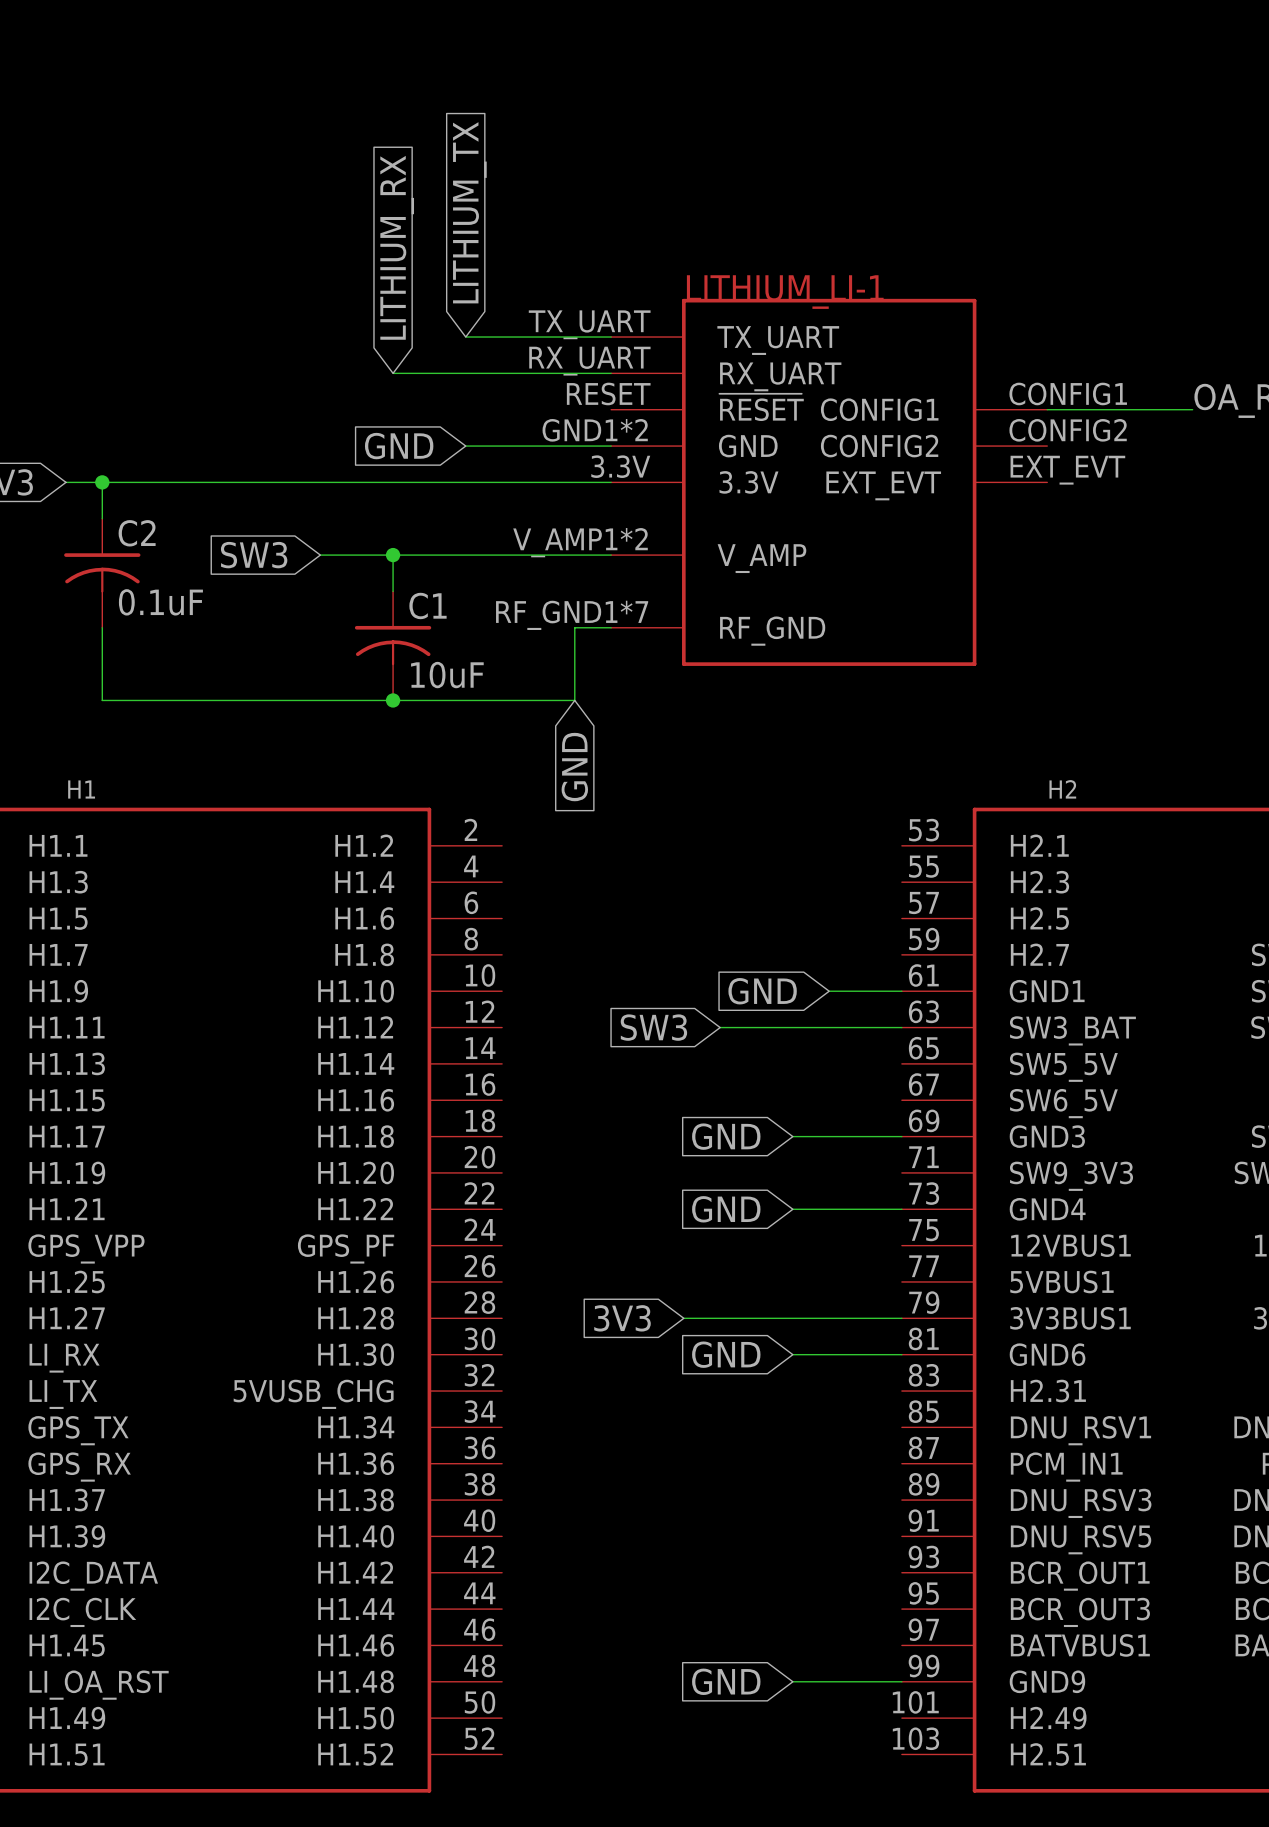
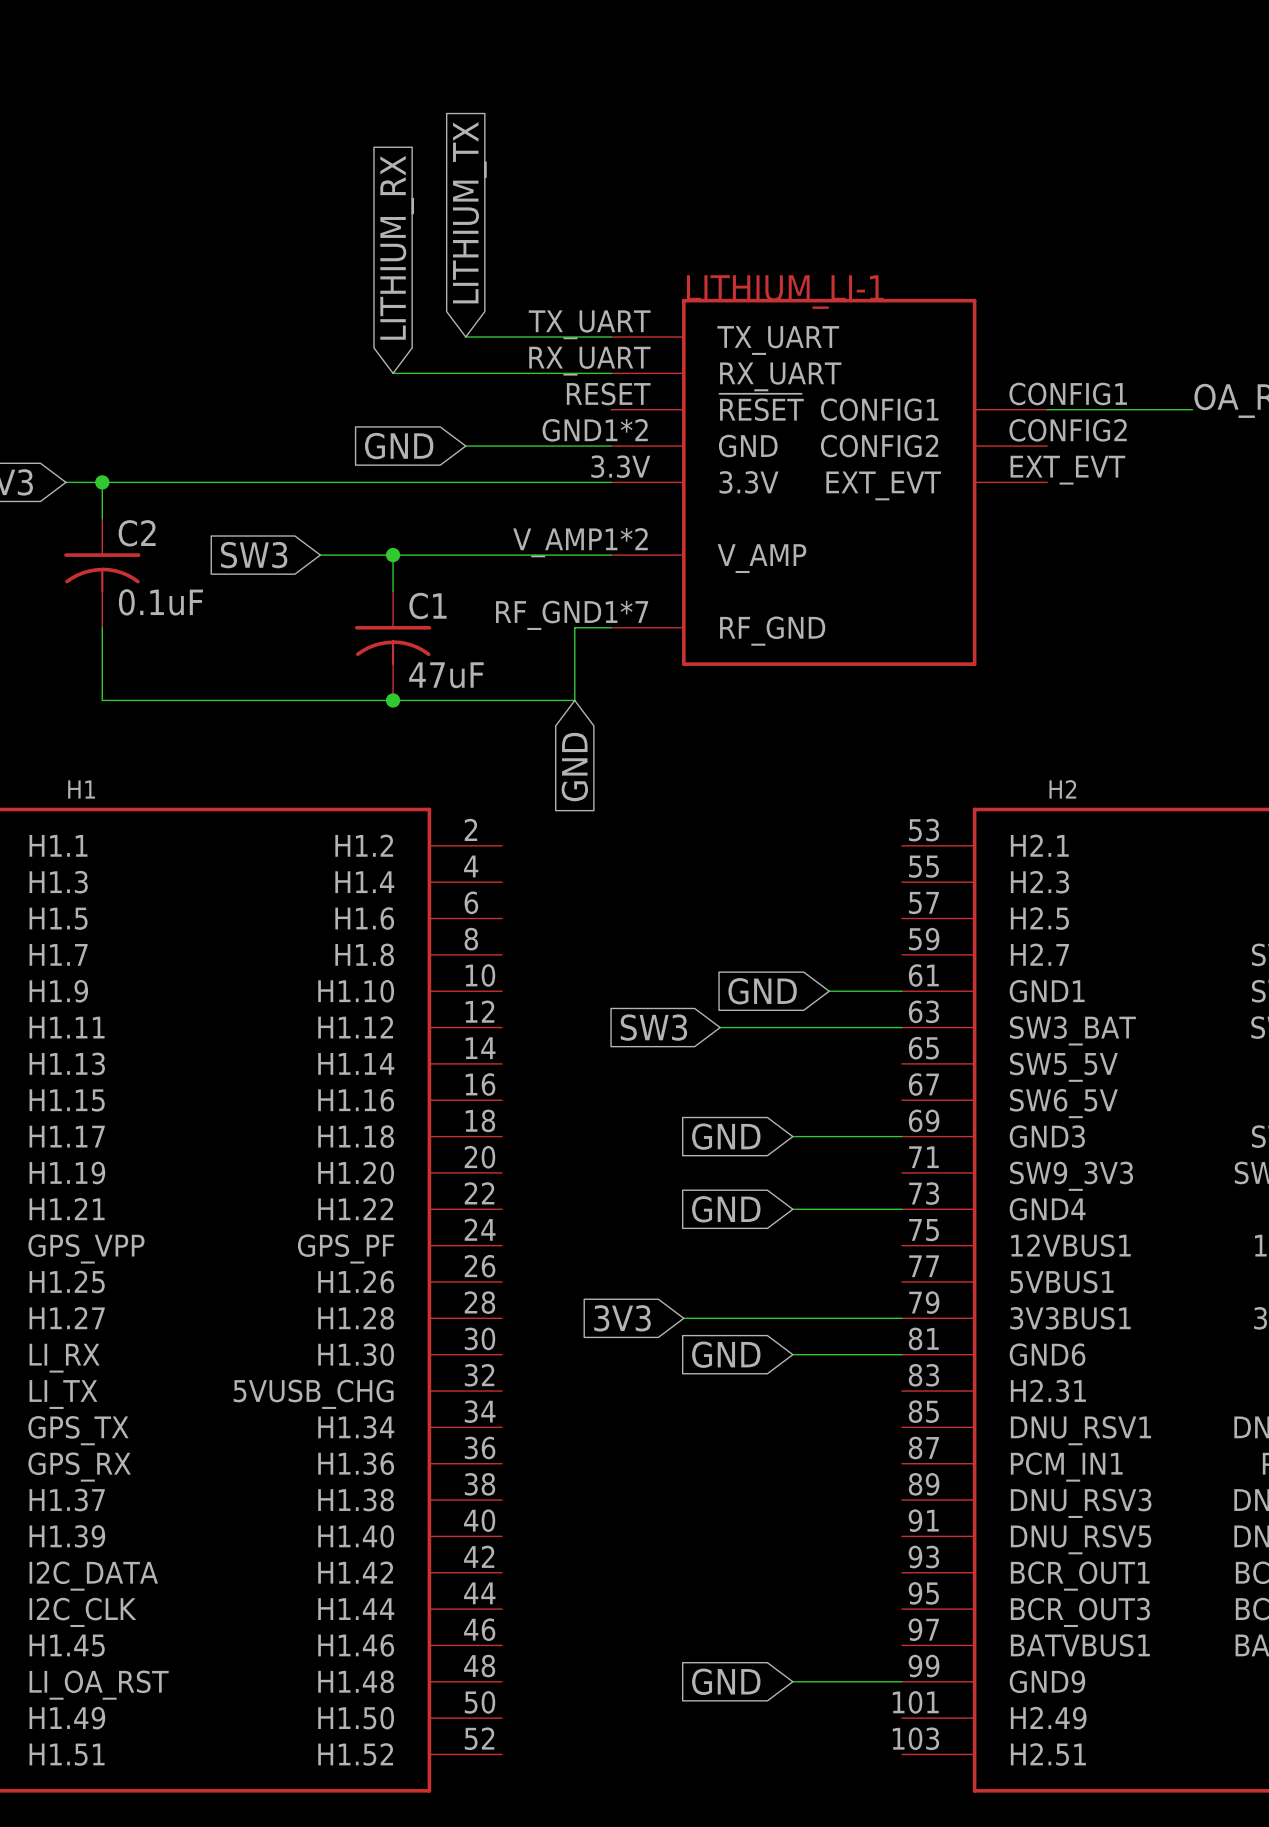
C1 value: 10uF (447, 675) -> 47uF (446, 675)

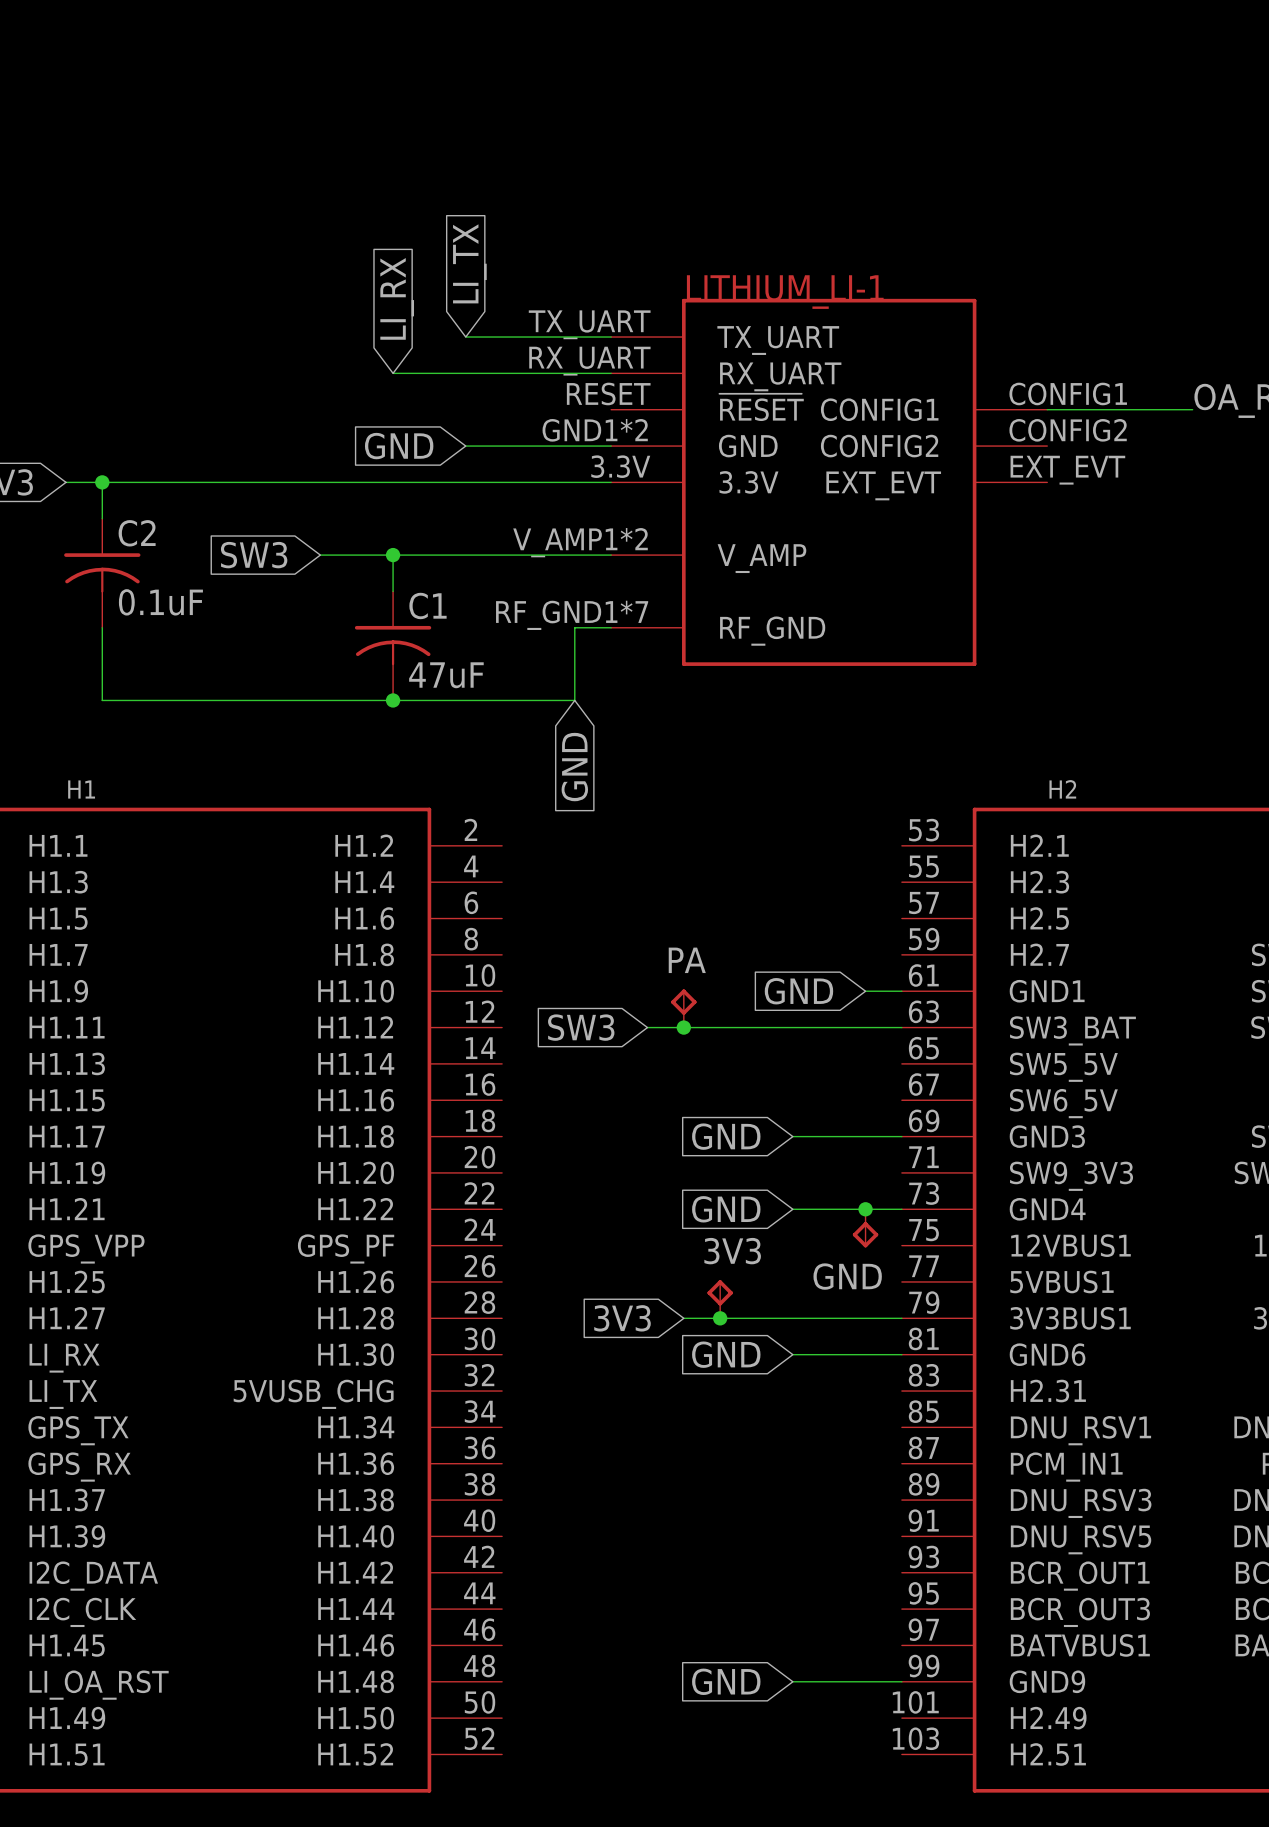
global label: LITHIUM_TX (469, 212) -> LI_TX (469, 263)
global label: LITHIUM_RX (397, 247) -> LI_RX (397, 298)
global label position: GND (762, 991) -> GND (798, 991)
wire: (829, 991) (865, 991) -> none
PA: none -> (683, 1008)
wire: none -> (647, 1027) (720, 1027)
global label position: SW3 (653, 1027) -> SW3 (581, 1027)
junction: none -> (683, 1027)
junction: none -> (865, 1209)
GND: none -> (865, 1228)
3V3: none -> (720, 1299)
junction: none -> (720, 1318)

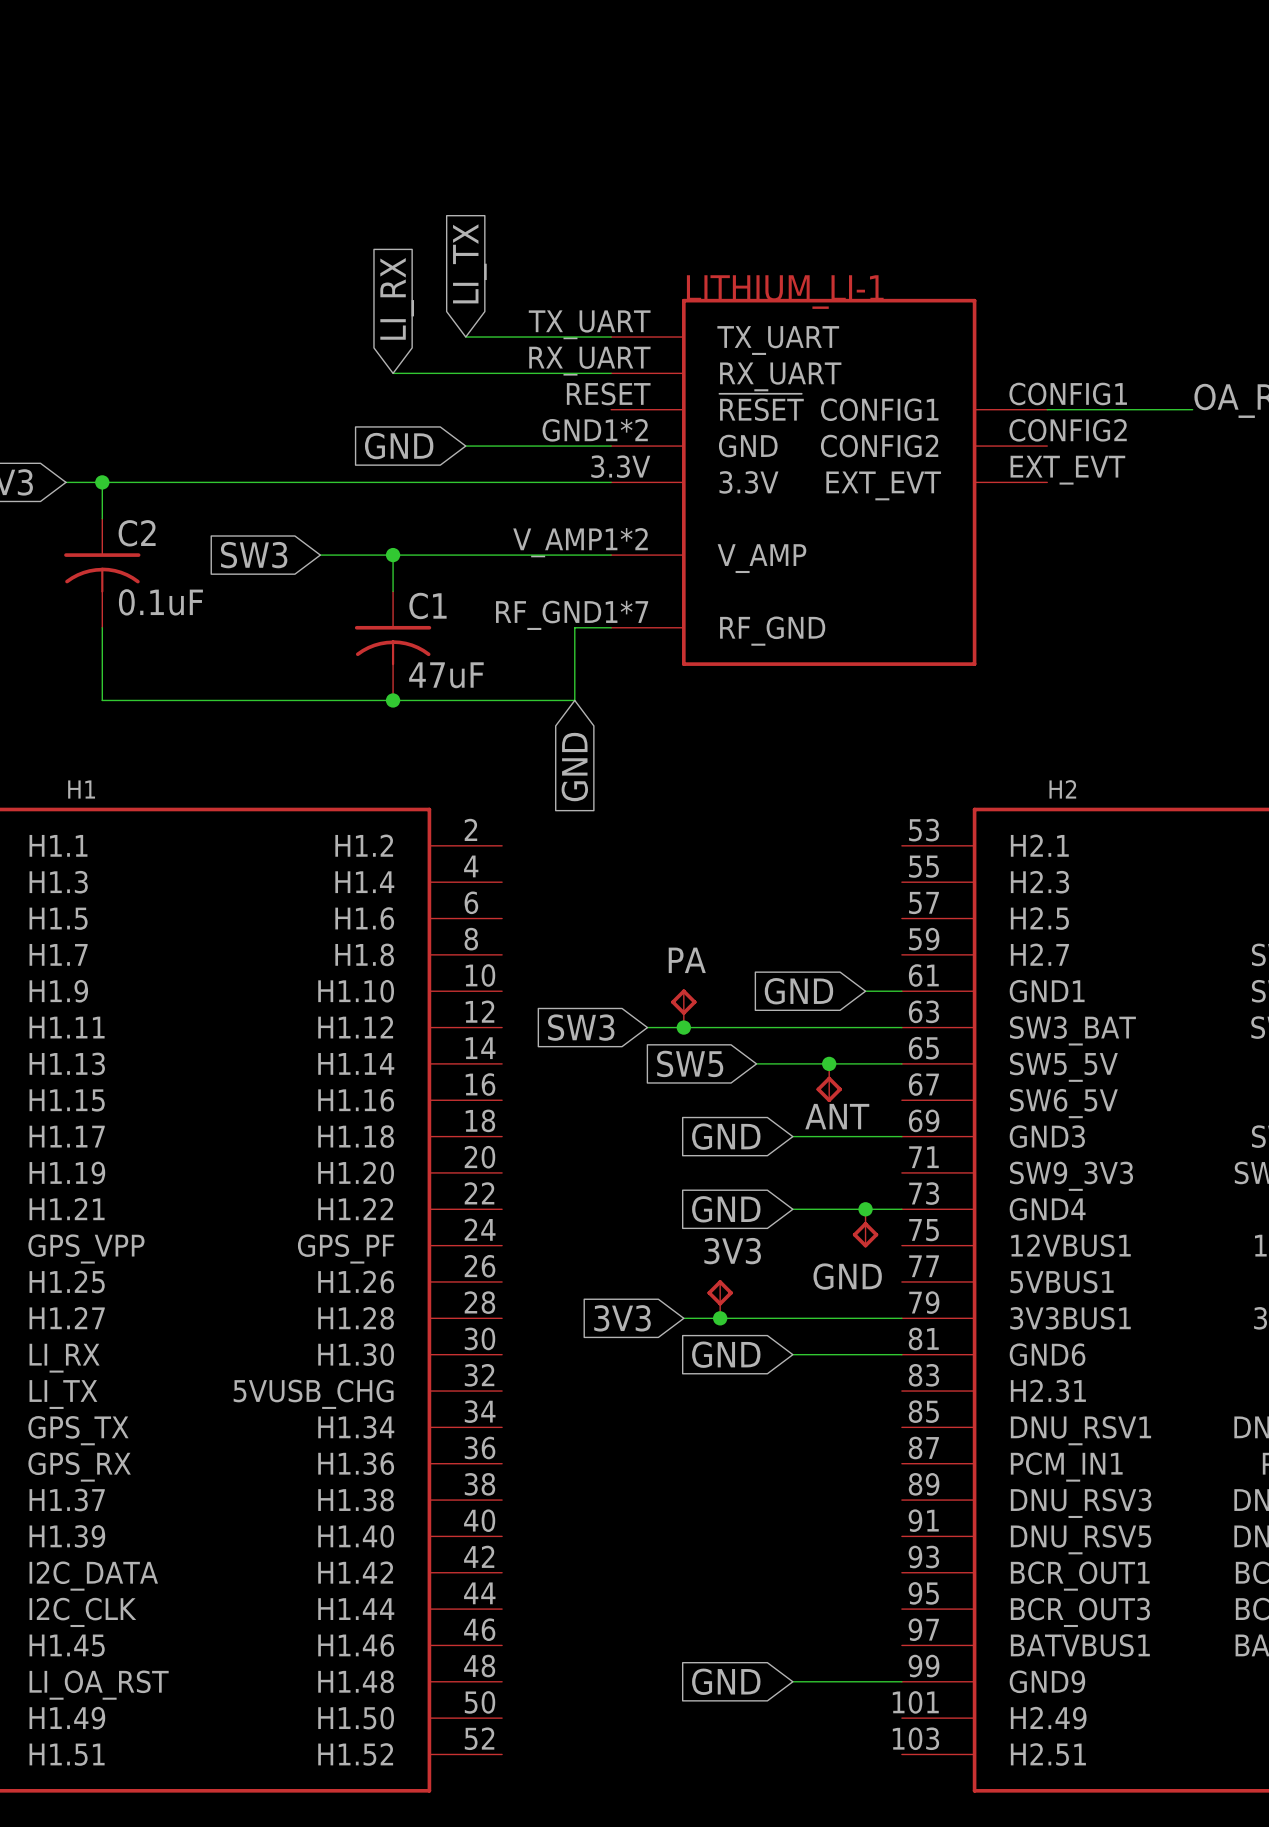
global label: none -> SW5 (690, 1063)
wire: none -> (756, 1063) (901, 1063)
junction: none -> (829, 1063)
ANT: none -> (829, 1082)

